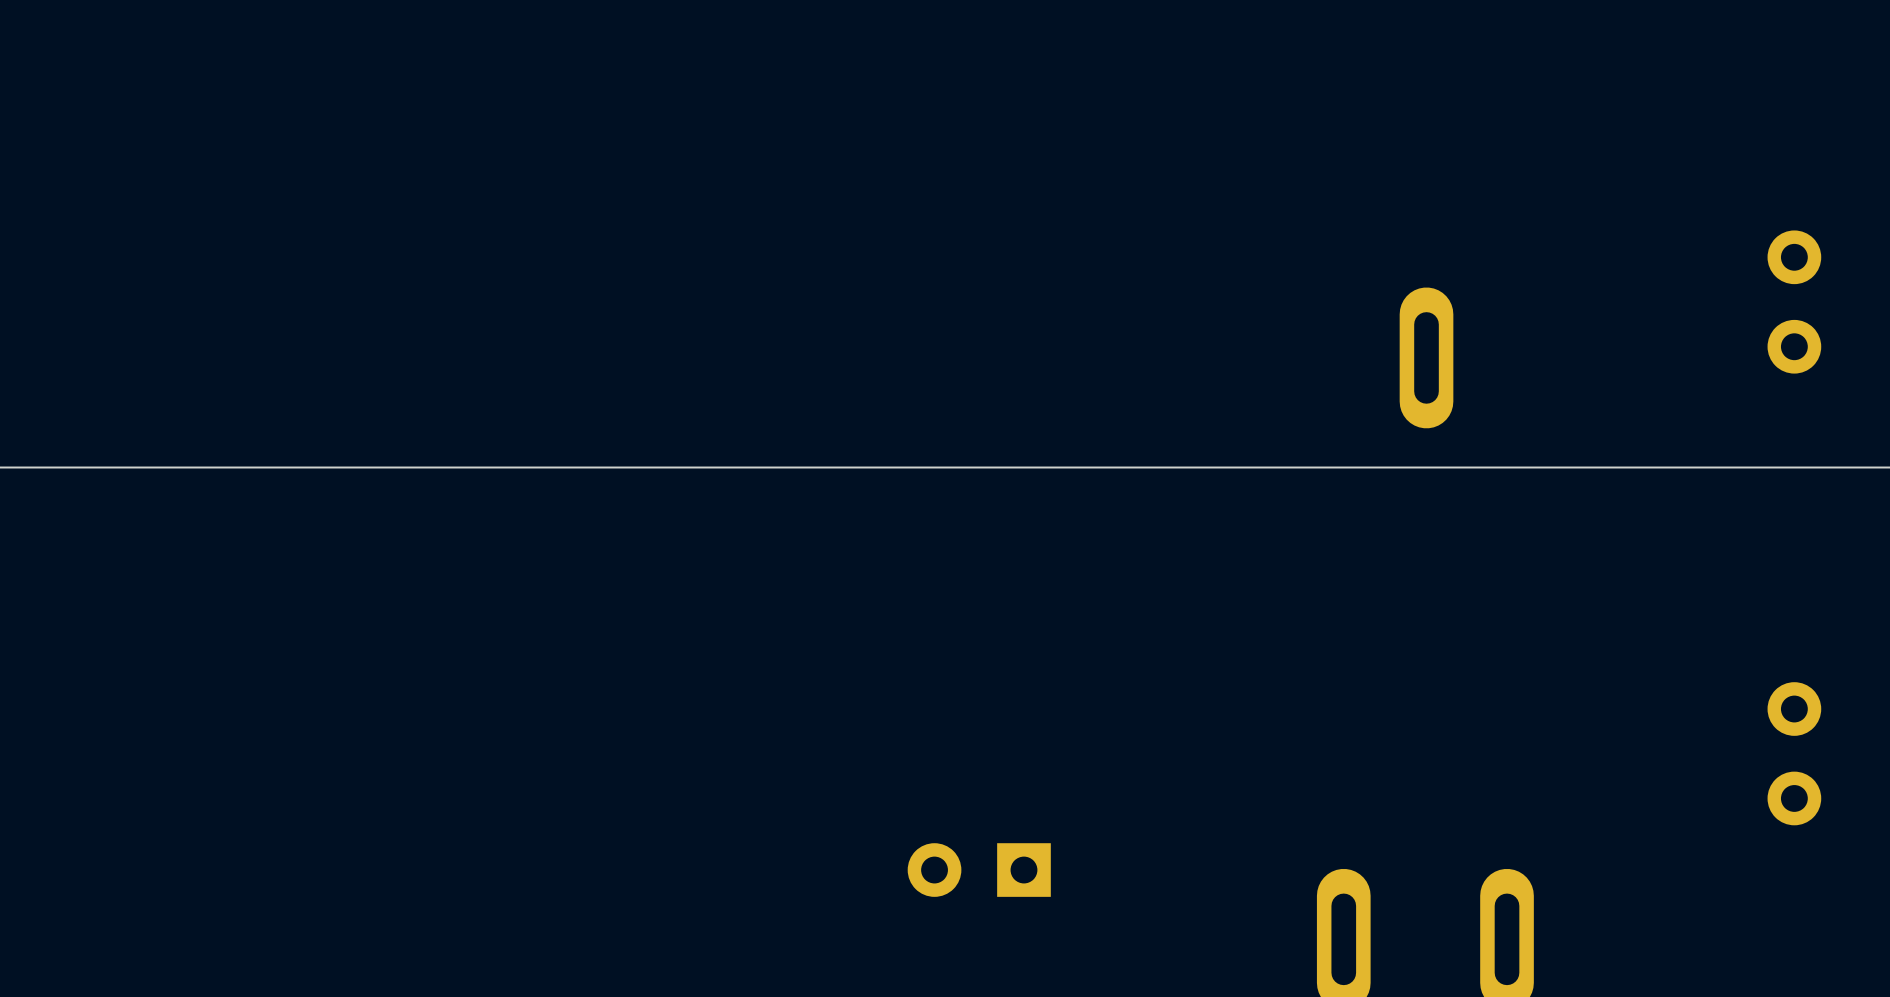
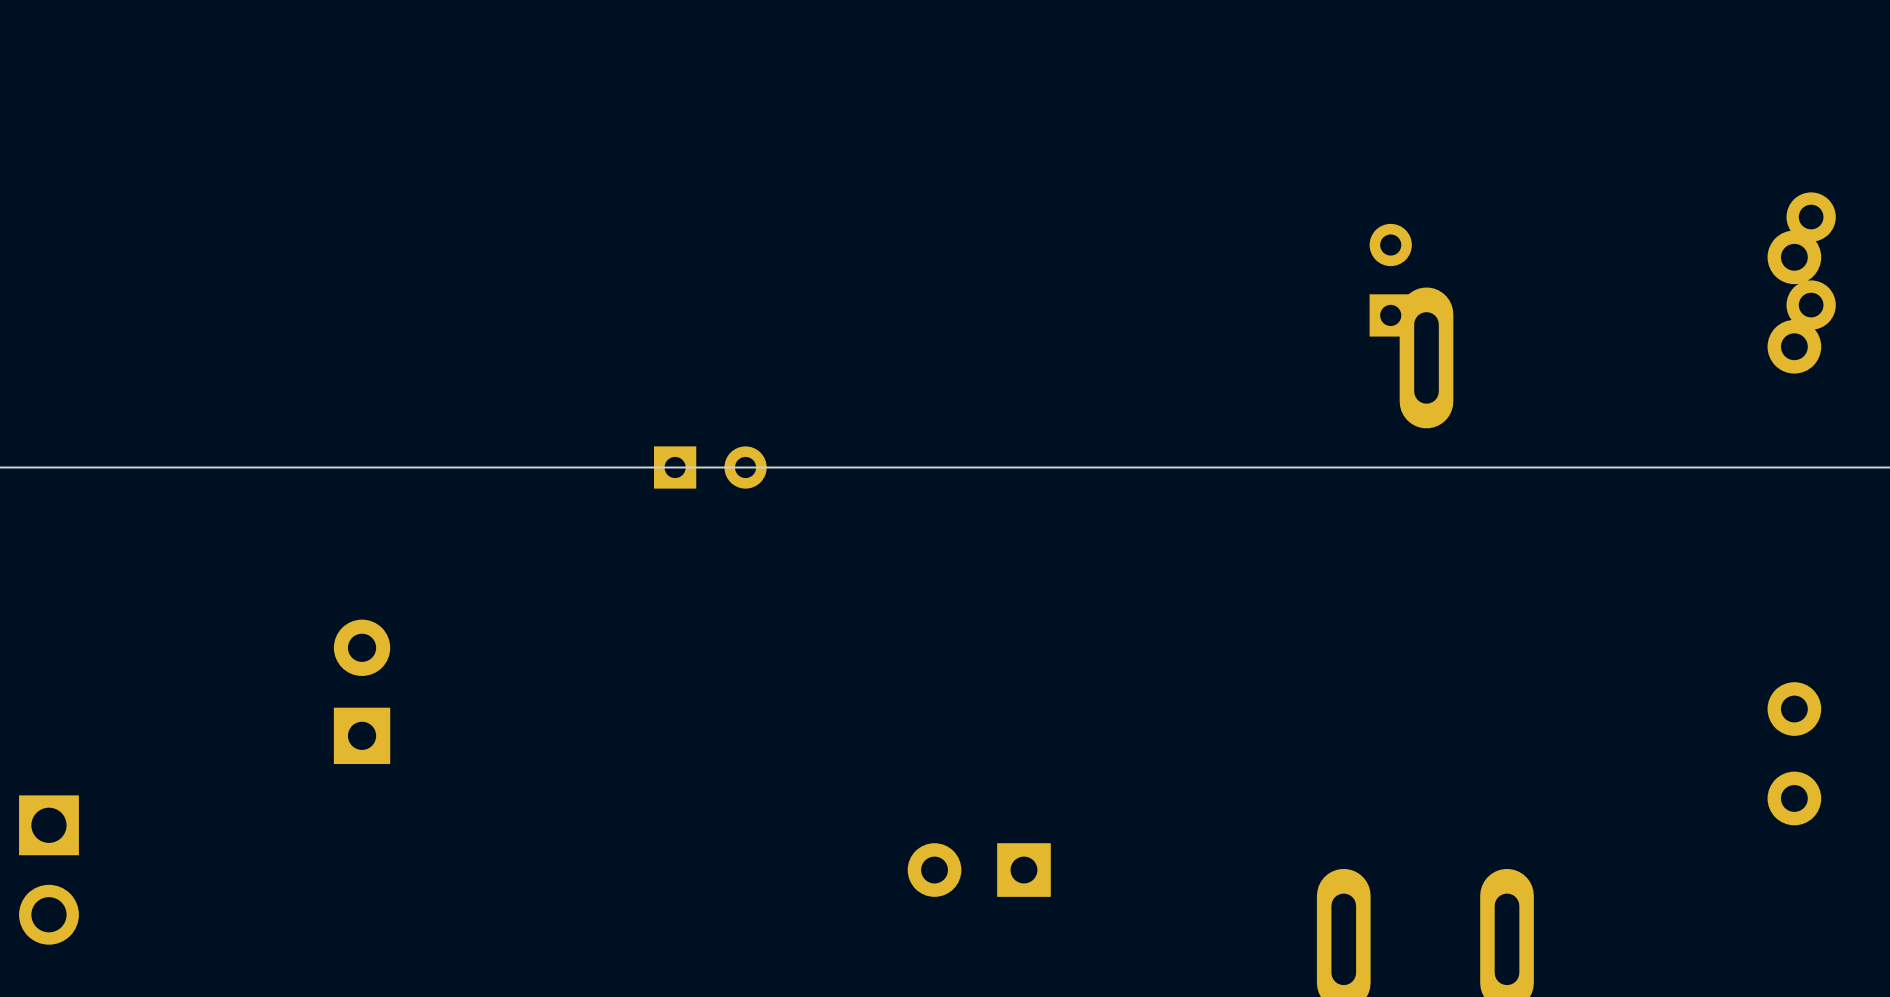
part: none -> (1811, 261)
part: none -> (1390, 280)
part: none -> (710, 467)
part: none -> (362, 691)
part: none -> (48, 870)

